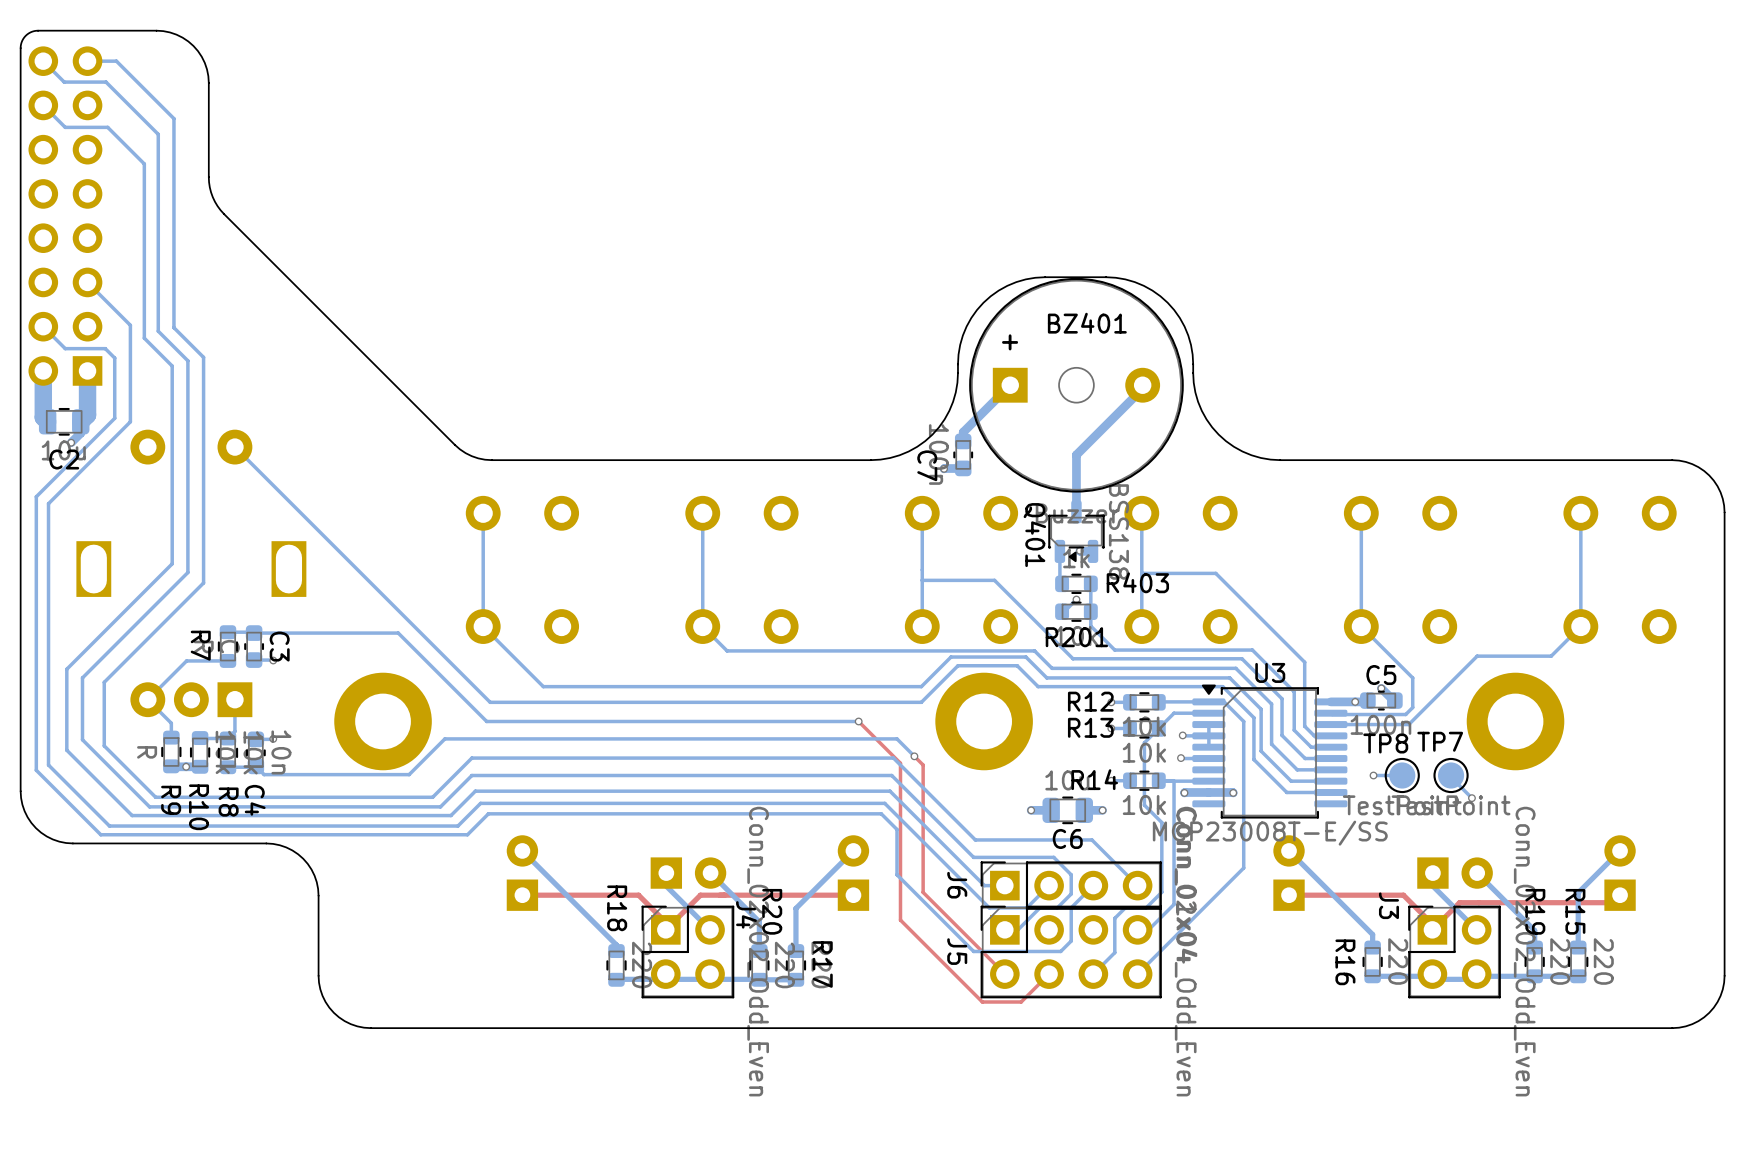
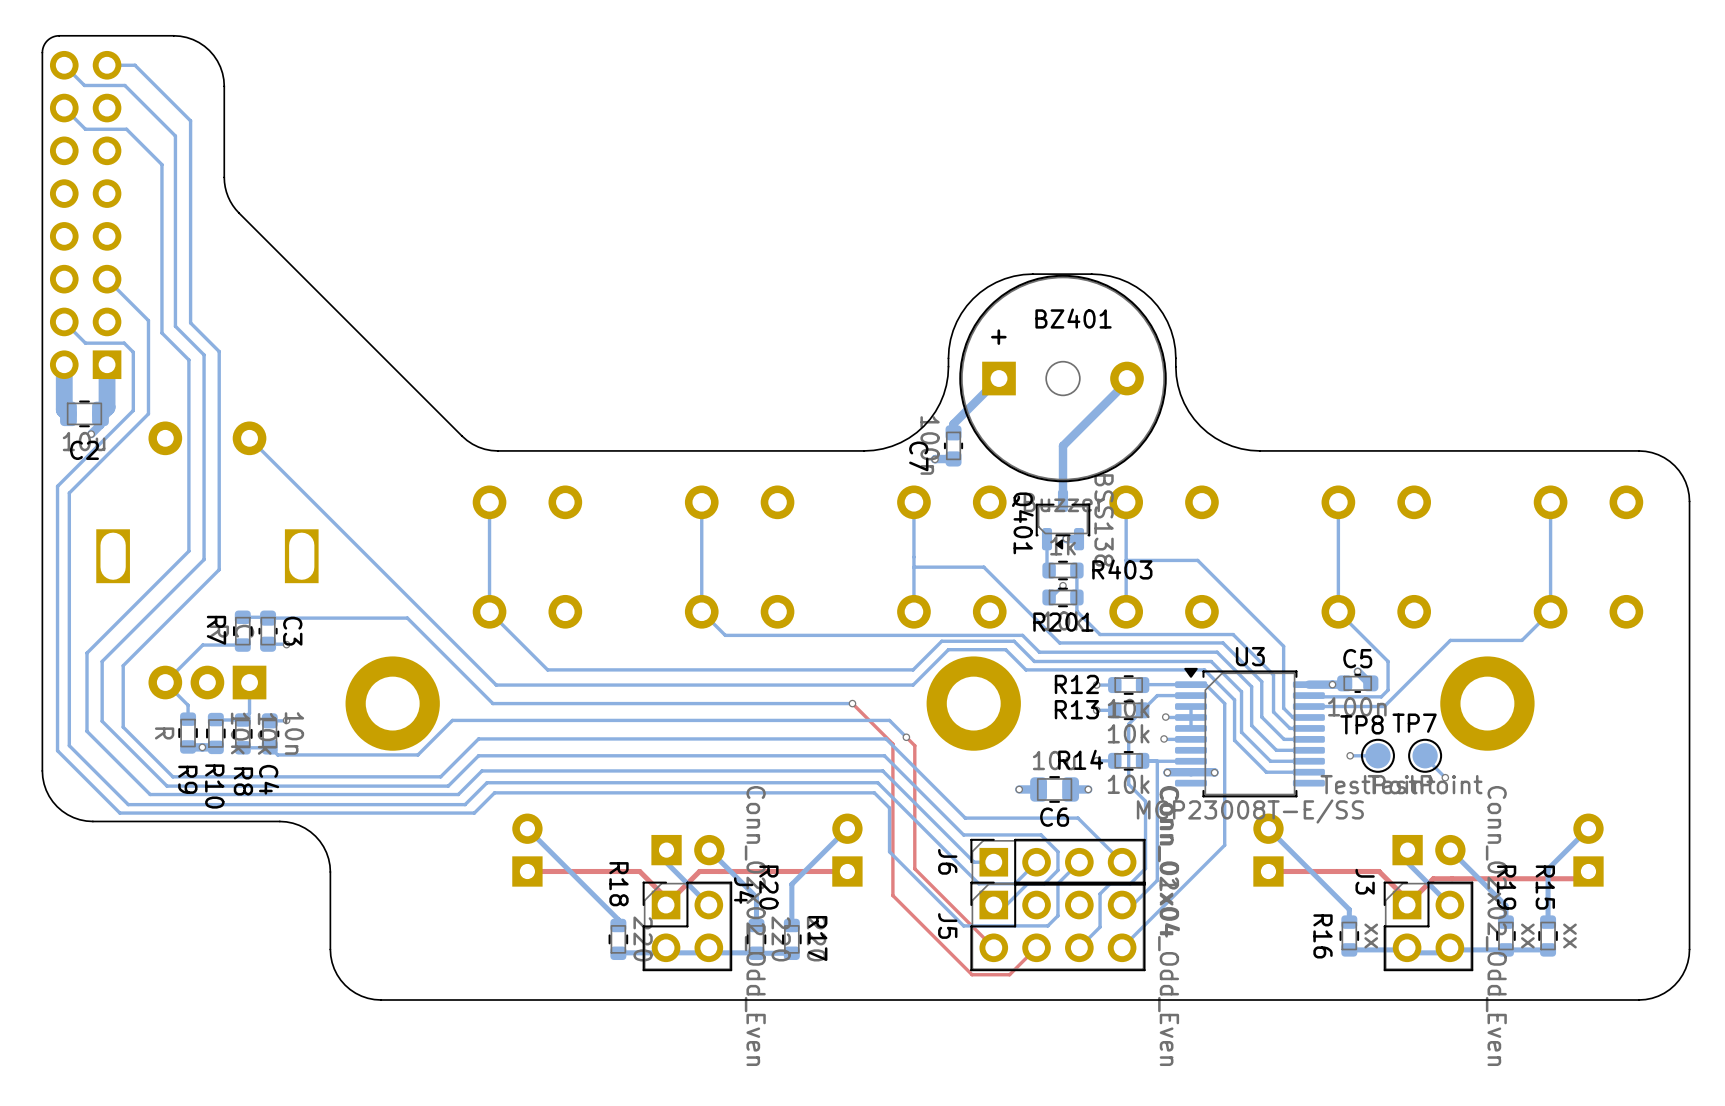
R16 value: 220 (1398, 961) -> xx (1371, 936)
R19 value: 220 (1560, 961) -> xx (1527, 936)
R15 value: 220 (1603, 961) -> xx (1569, 936)

